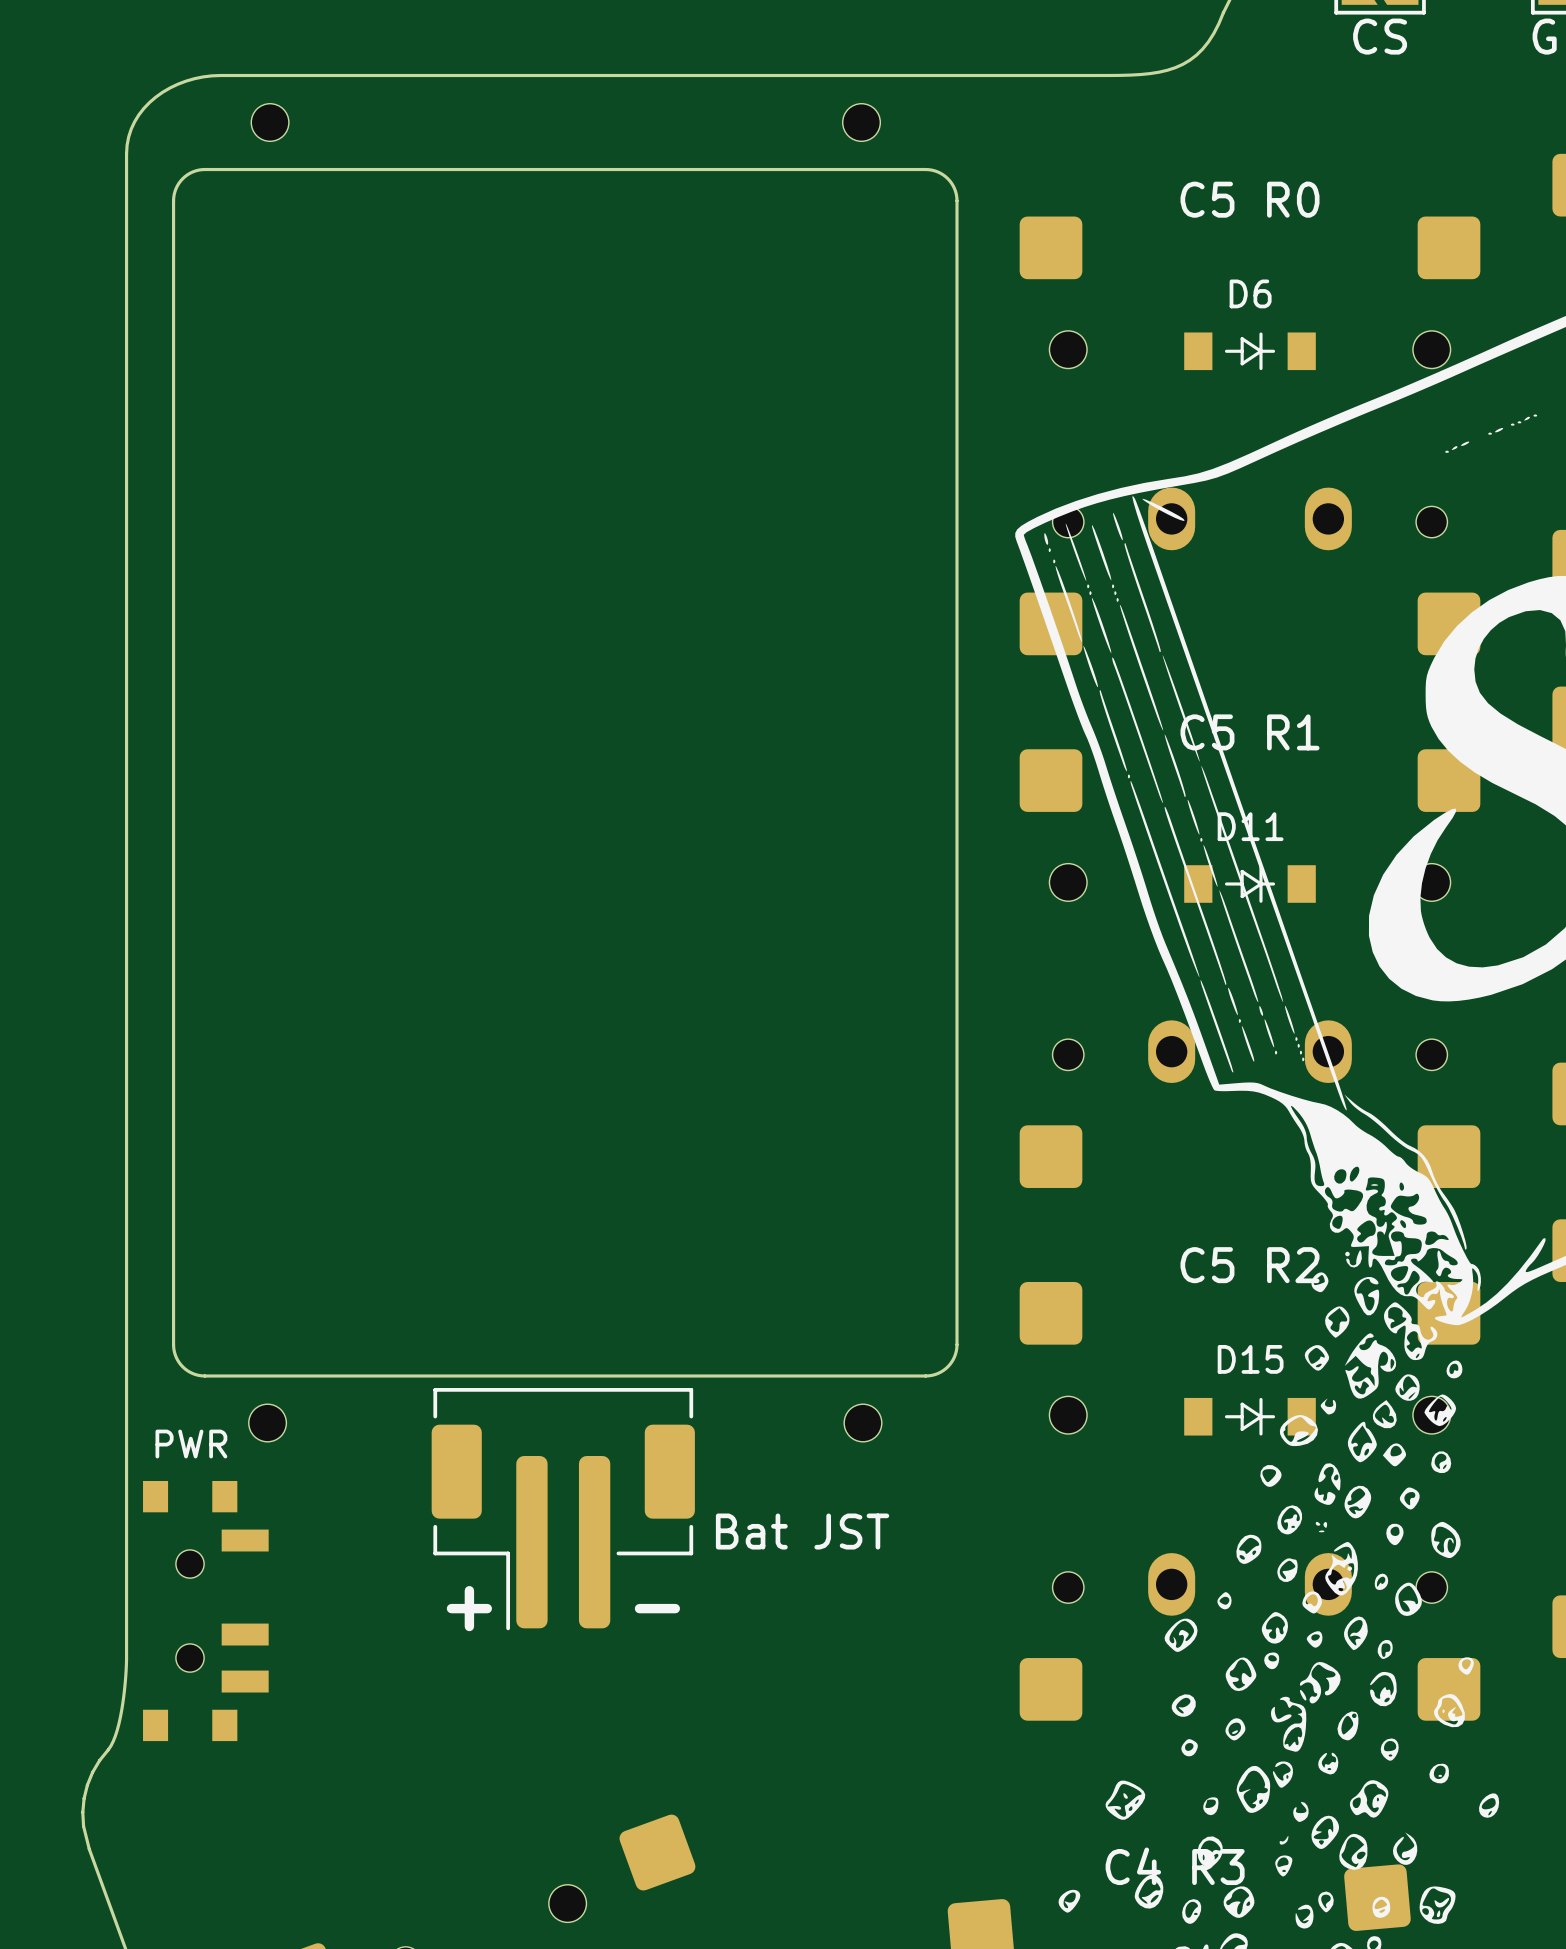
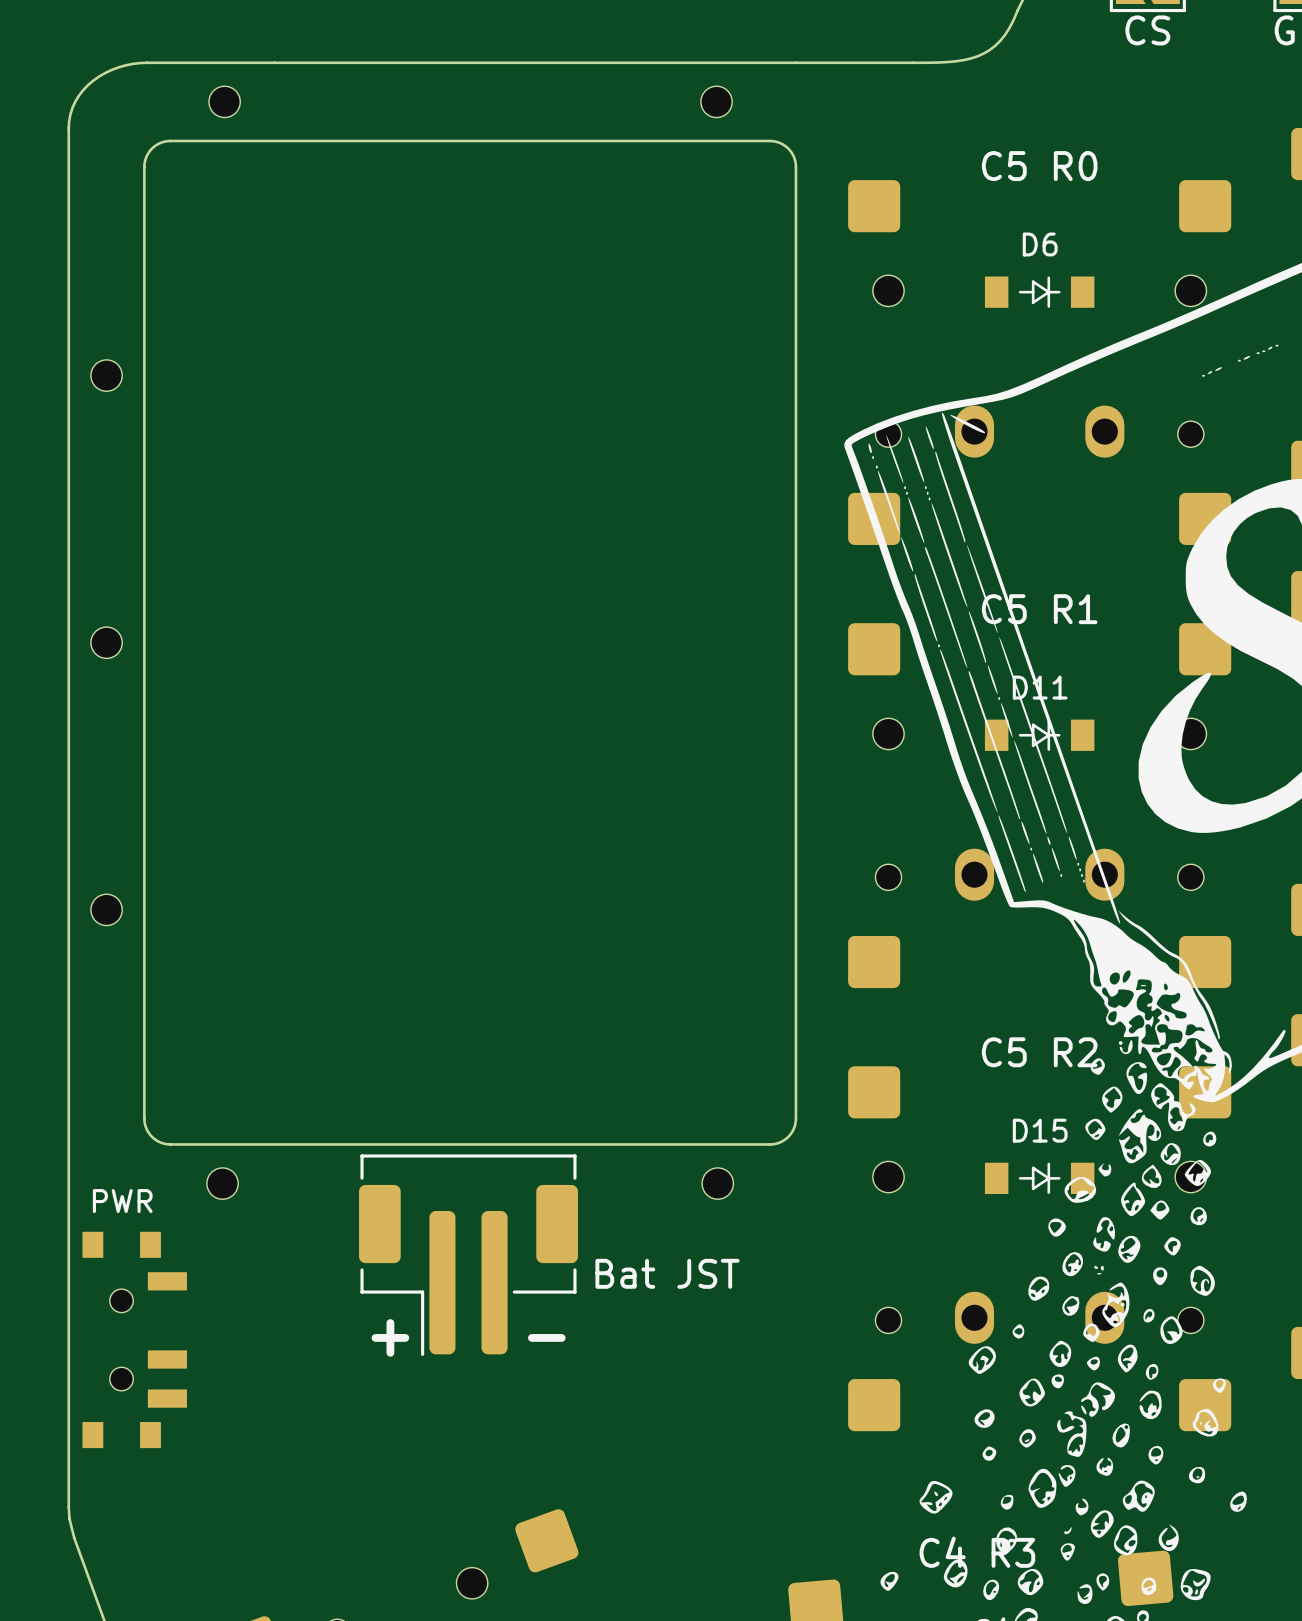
board edge: (220, 75) (186, 81) (155, 97) (143, 108) (134, 121) (127, 145) (126, 1661) (118, 1723) (110, 1746) (99, 1760) (87, 1785) (82, 1812) (83, 1826) -> (183, 62) (132, 63) (105, 73) (87, 85) (79, 95) (72, 107) (69, 120) (69, 1518)
part: none -> (106, 375)
part: none -> (106, 642)
part: none -> (106, 909)
part position: (190, 1611) -> (121, 1339)
PWR position: (205, 1611) -> (134, 1339)

